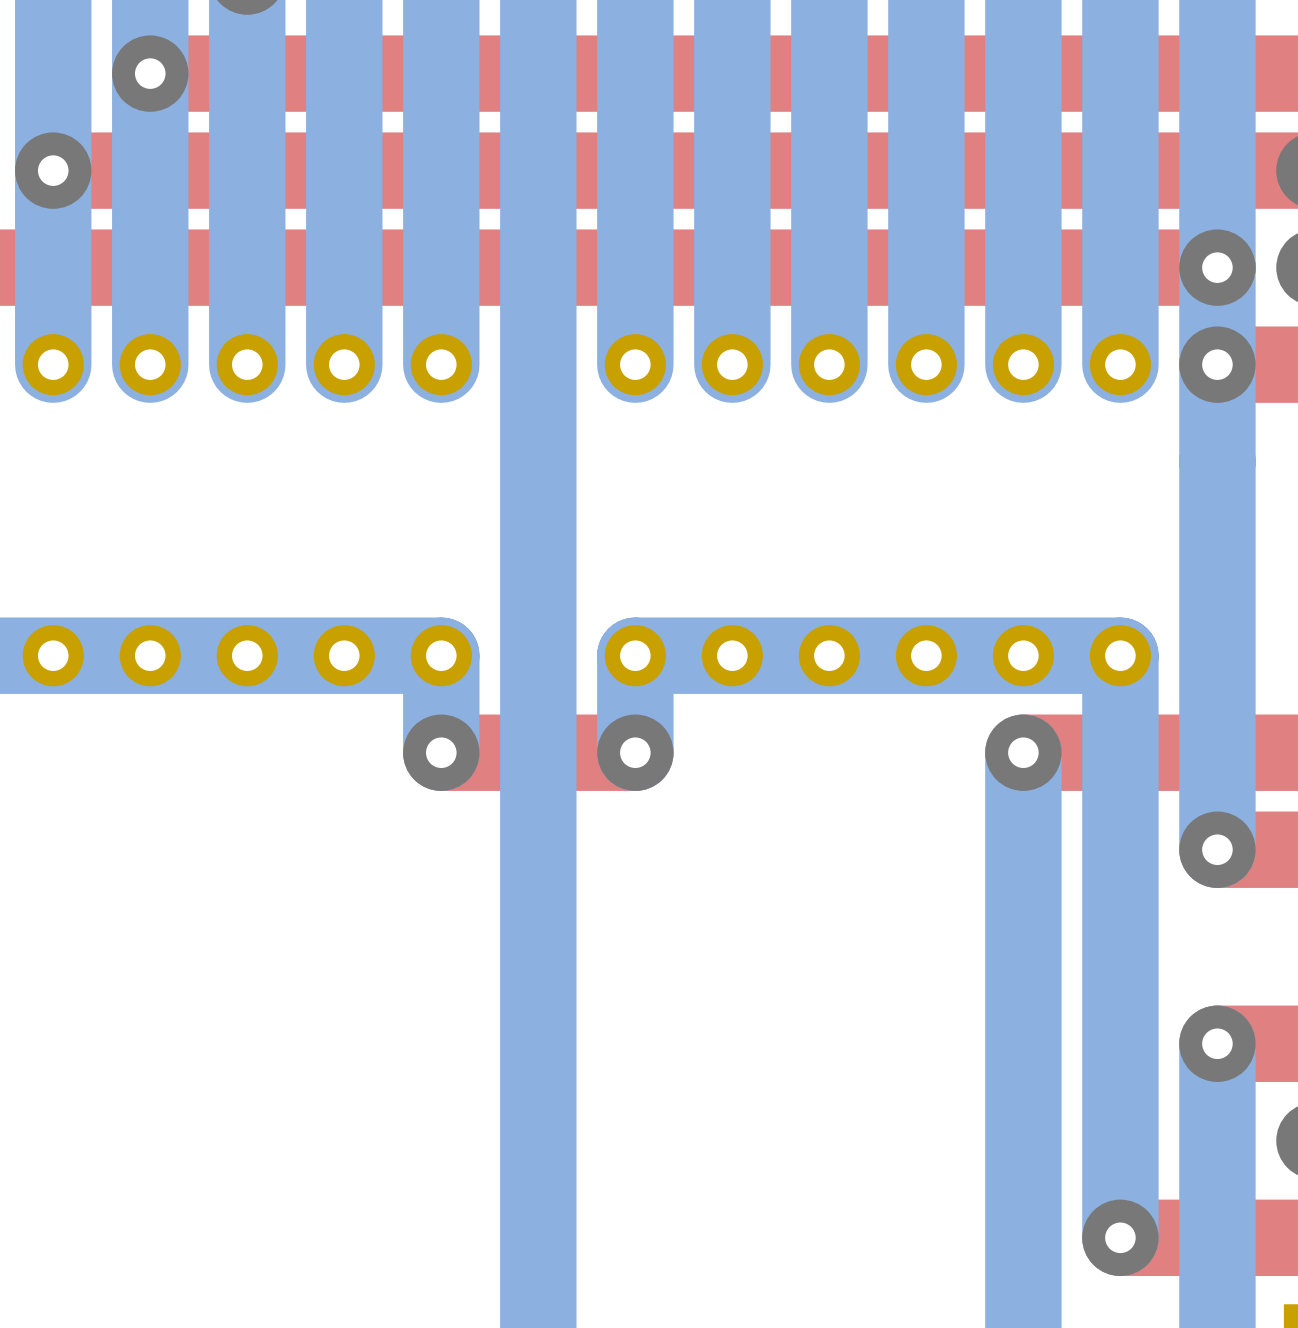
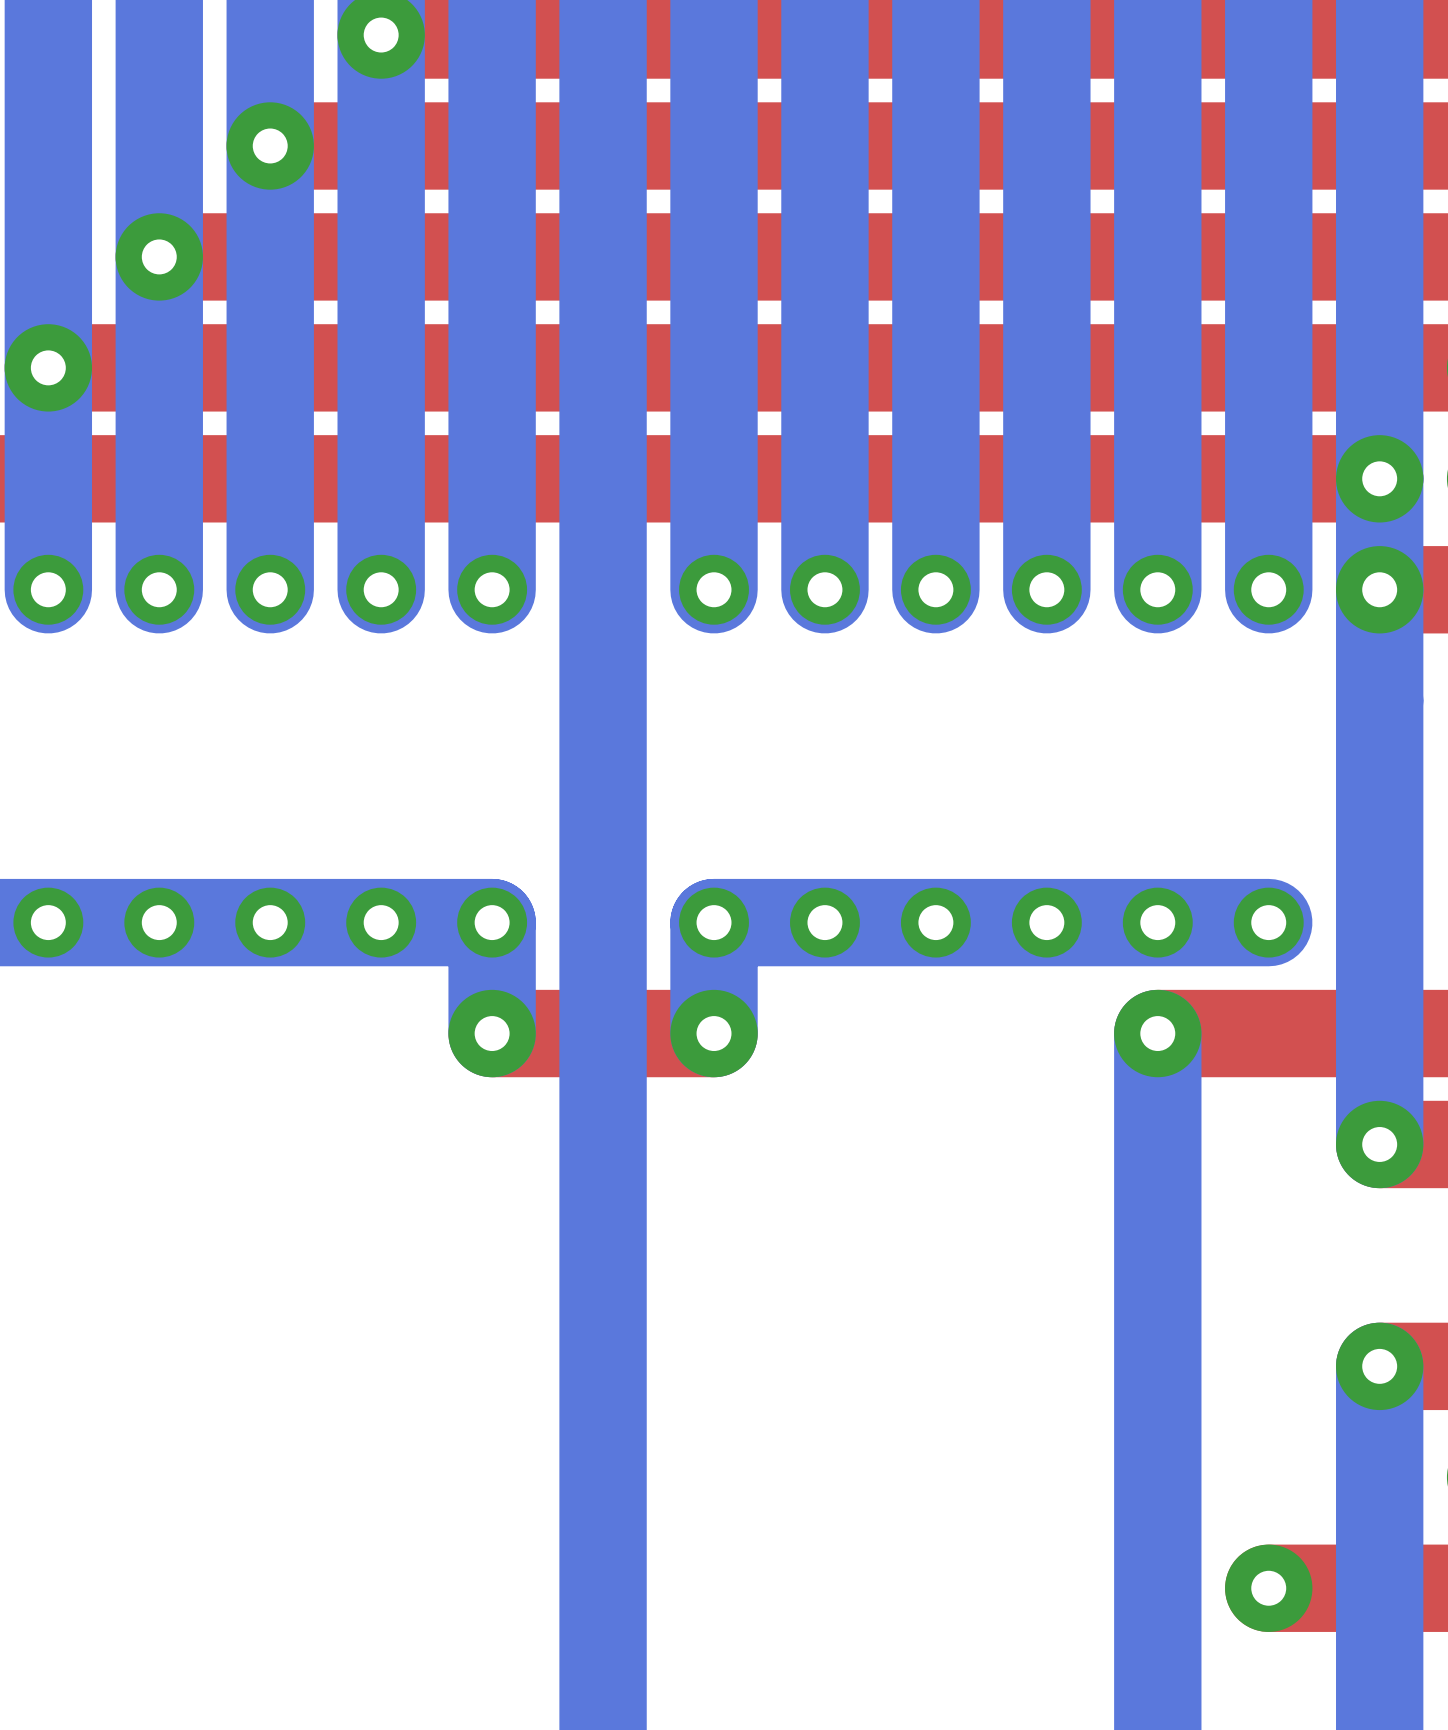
bottom track: (1120, 655) (1120, 1237) -> none

